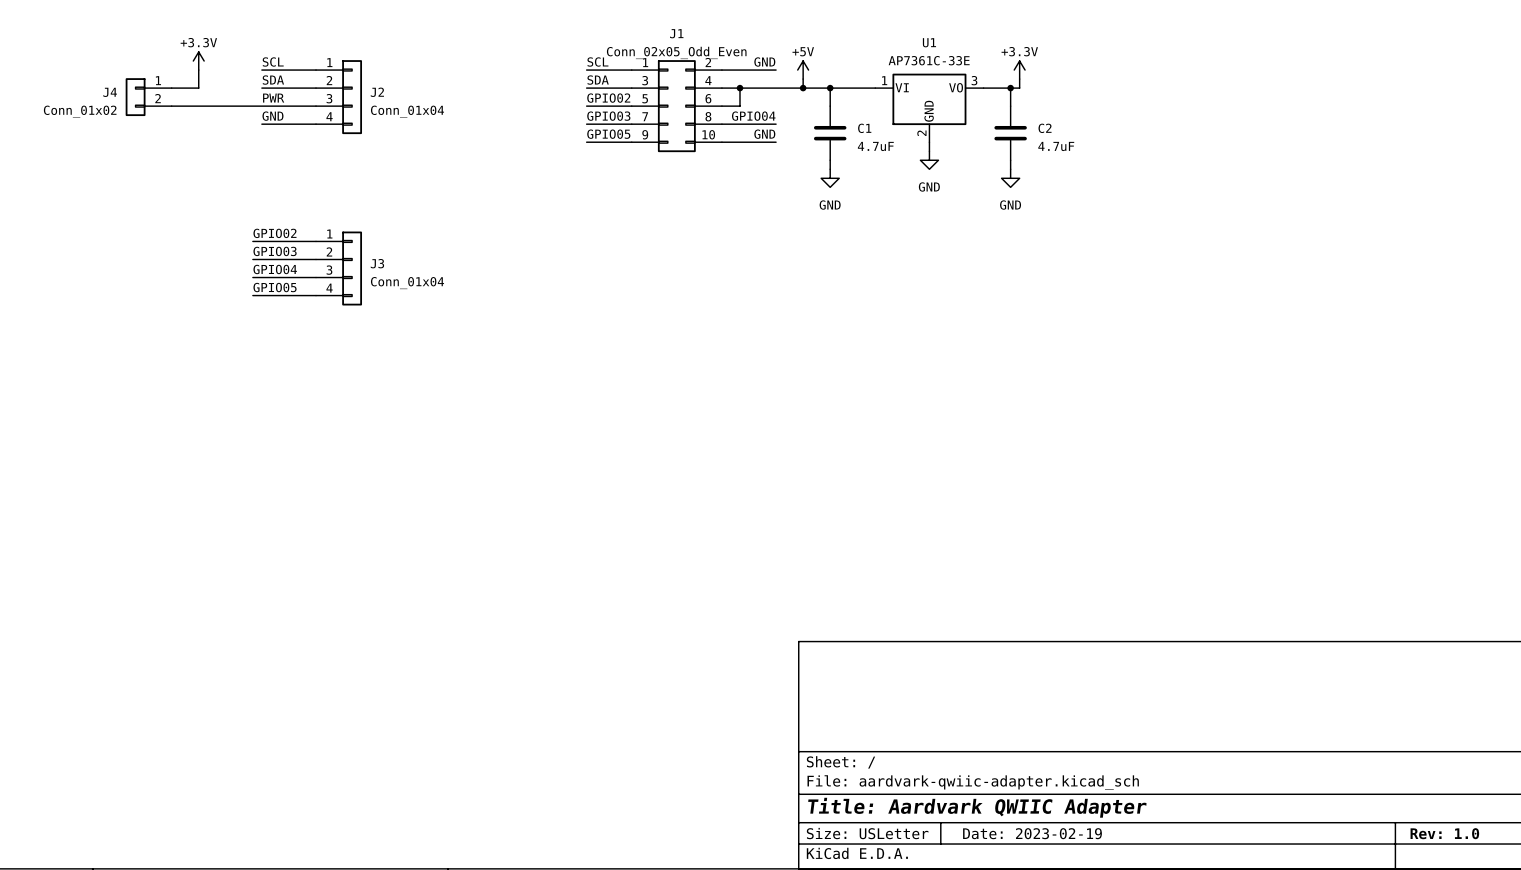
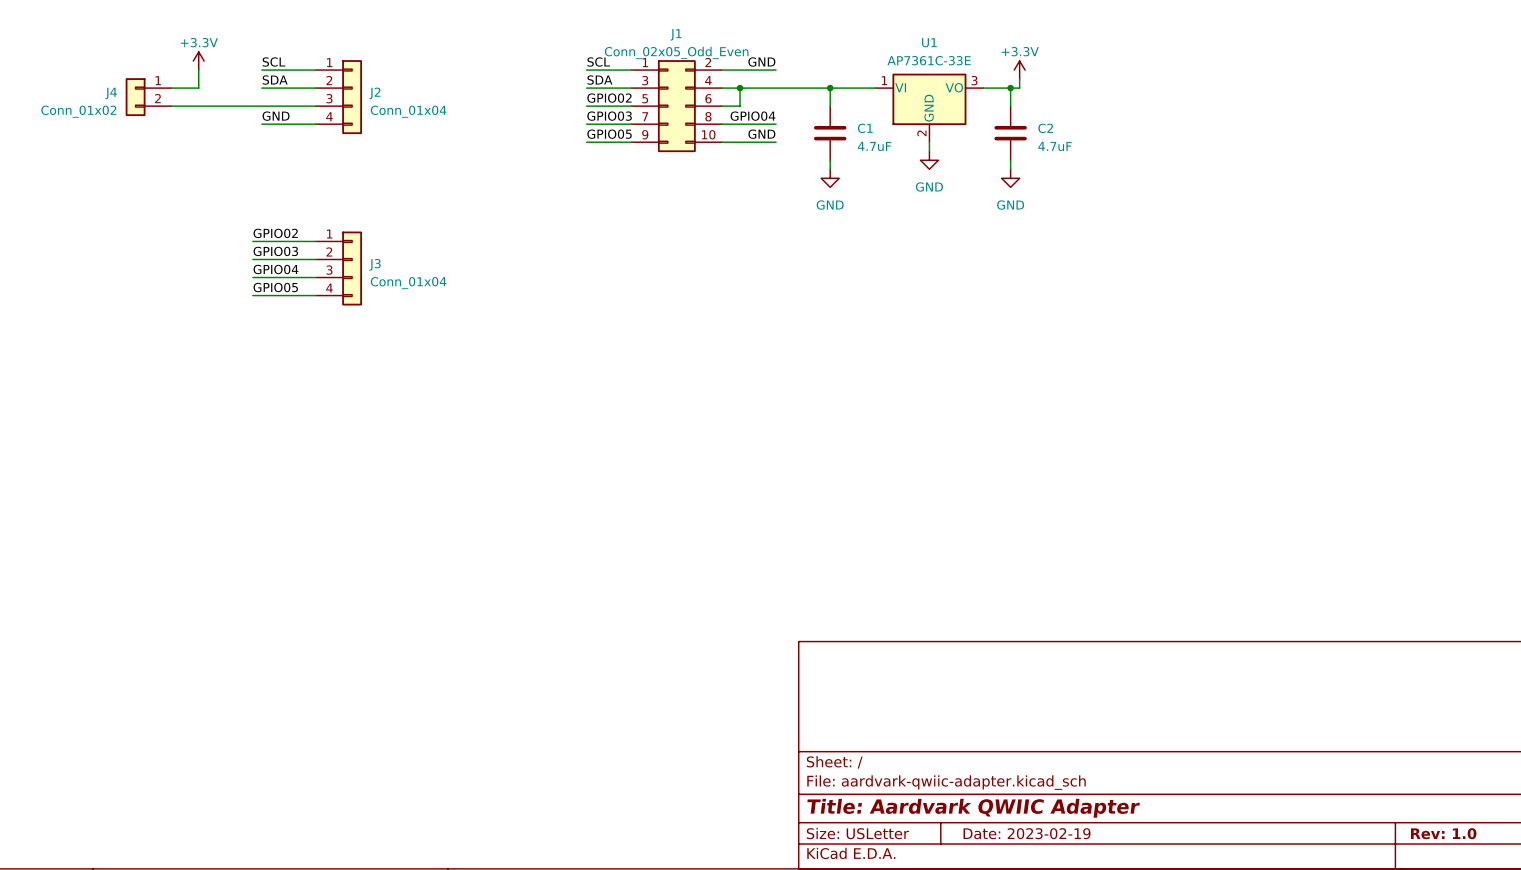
power symbol: +5V (803, 70) -> none
wire: (803, 79) (803, 88) -> none
junction: (803, 88) -> none
label: PWR (273, 98) -> none

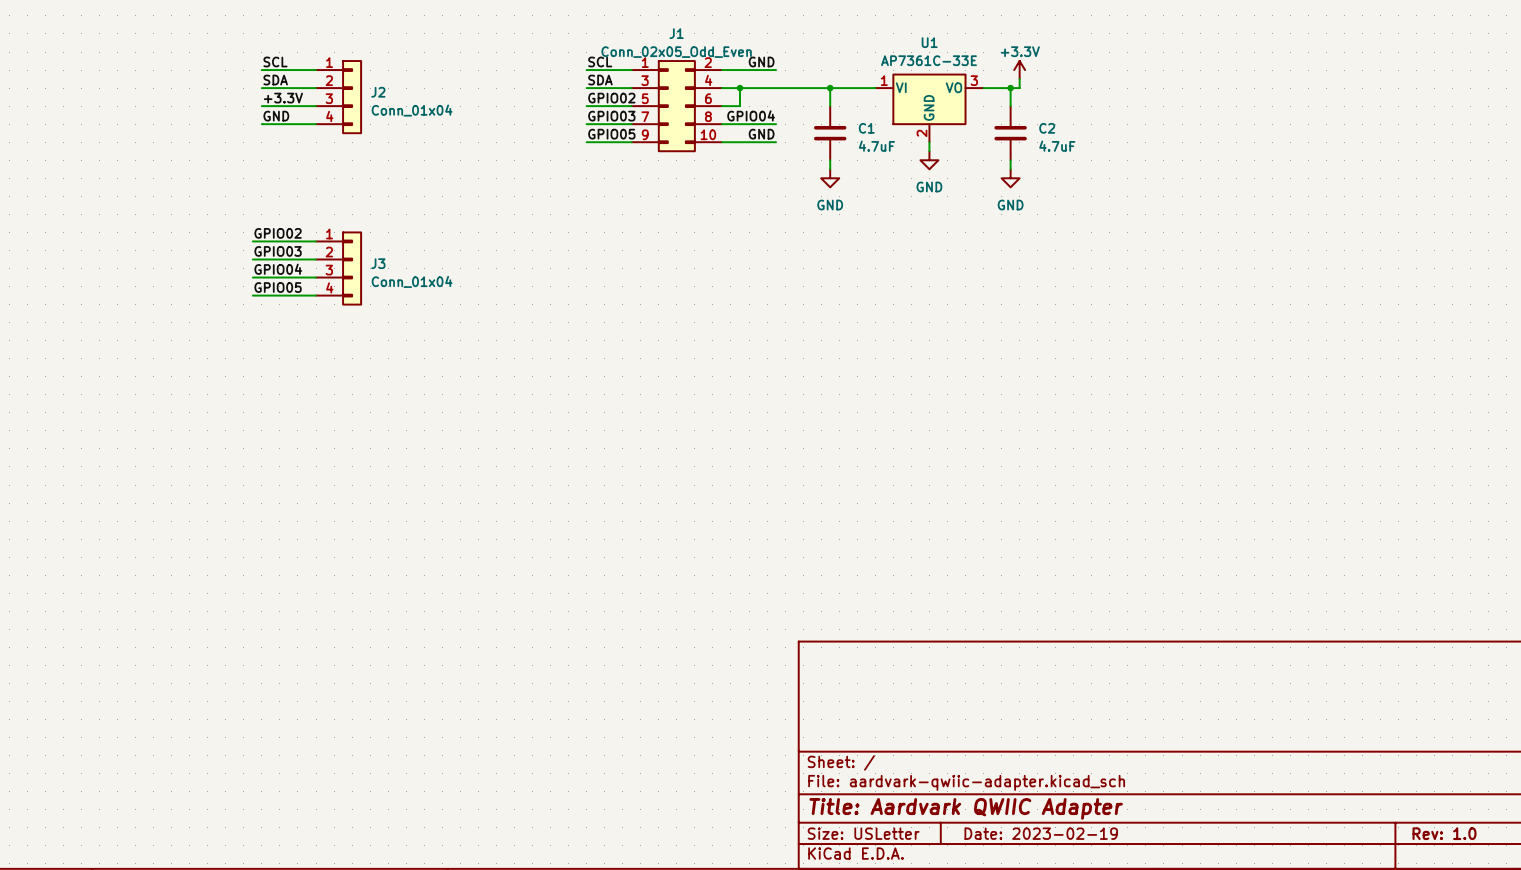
power symbol: +3.3V (198, 61) -> none
wire: (198, 70) (198, 88) (171, 88) -> none
J4: Conn_01x02 (148, 97) -> none
label: none -> +3.3V (283, 98)
wire: (171, 106) (261, 106) -> none

